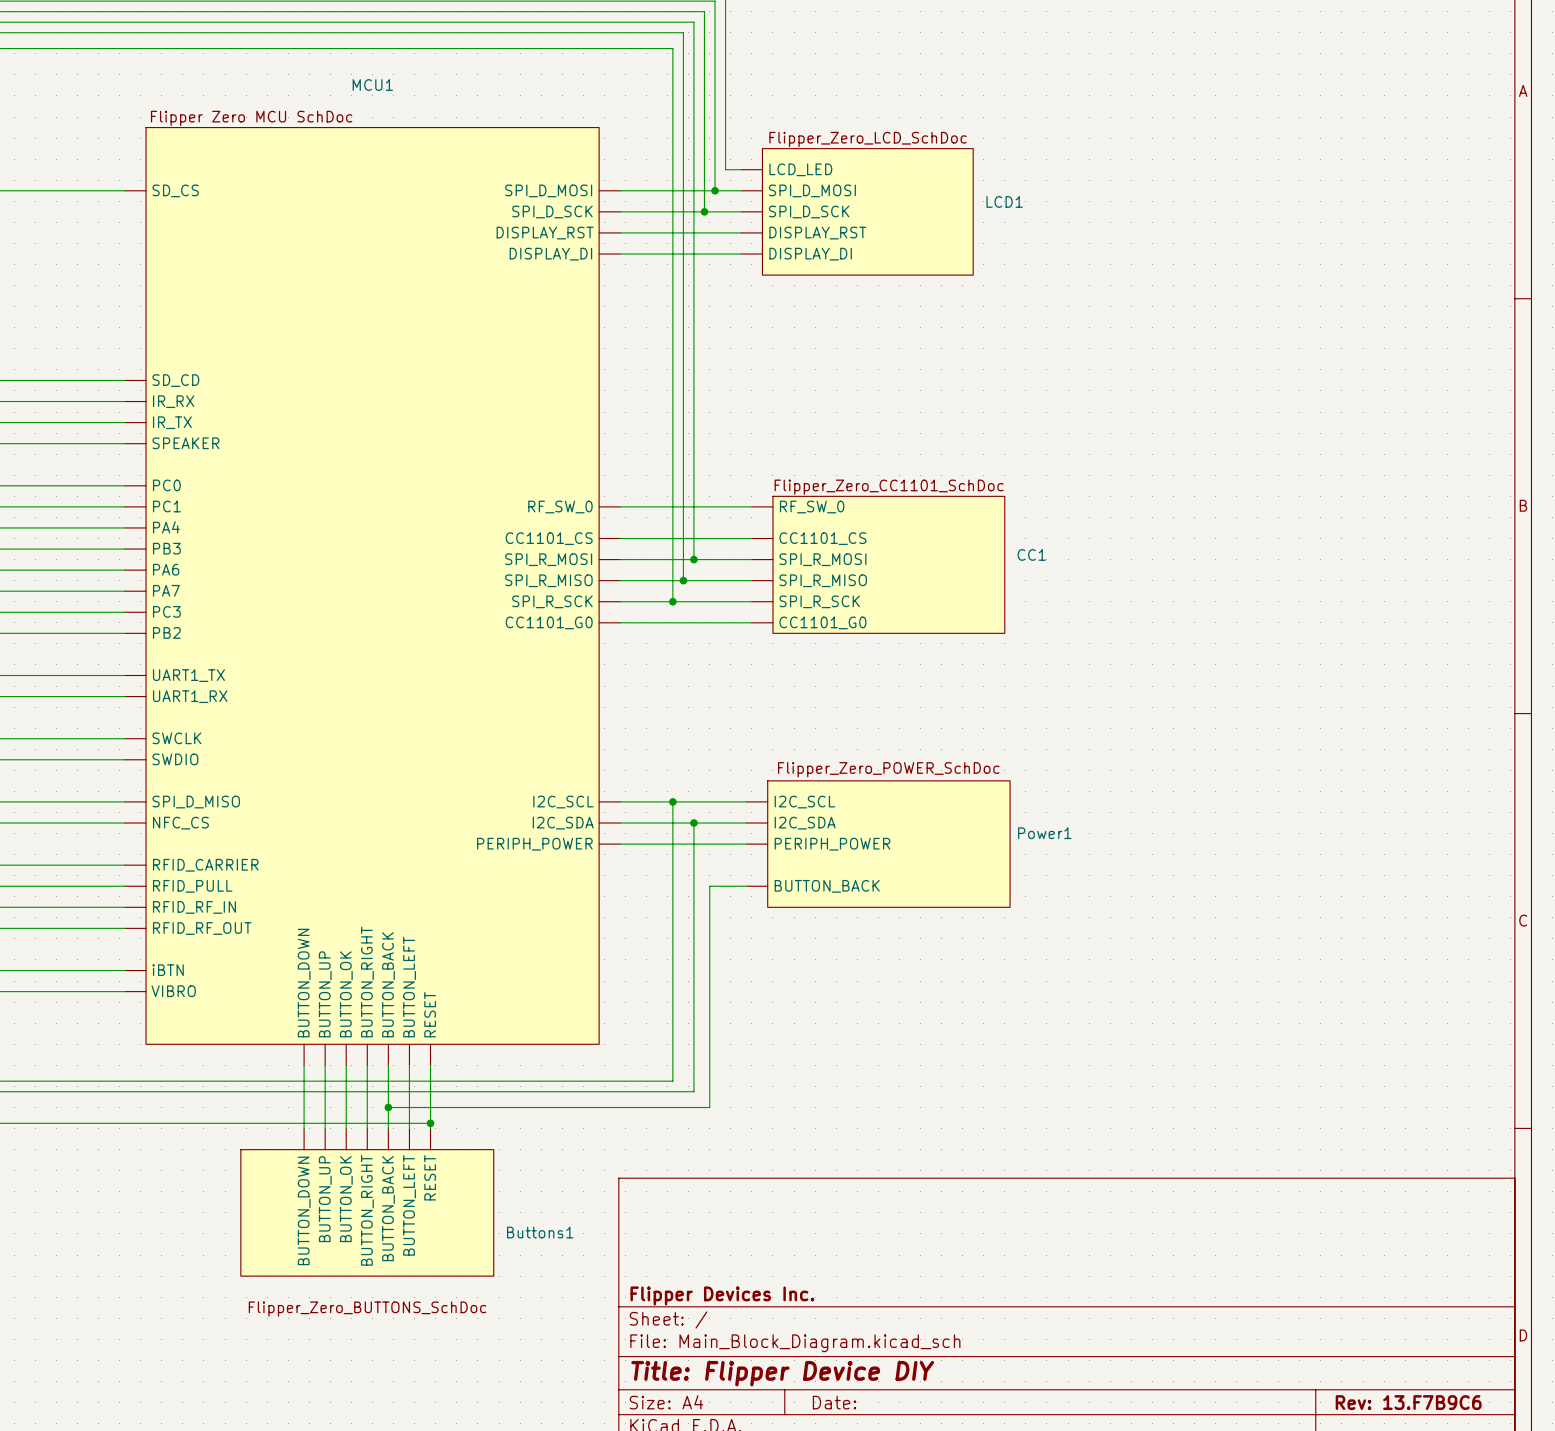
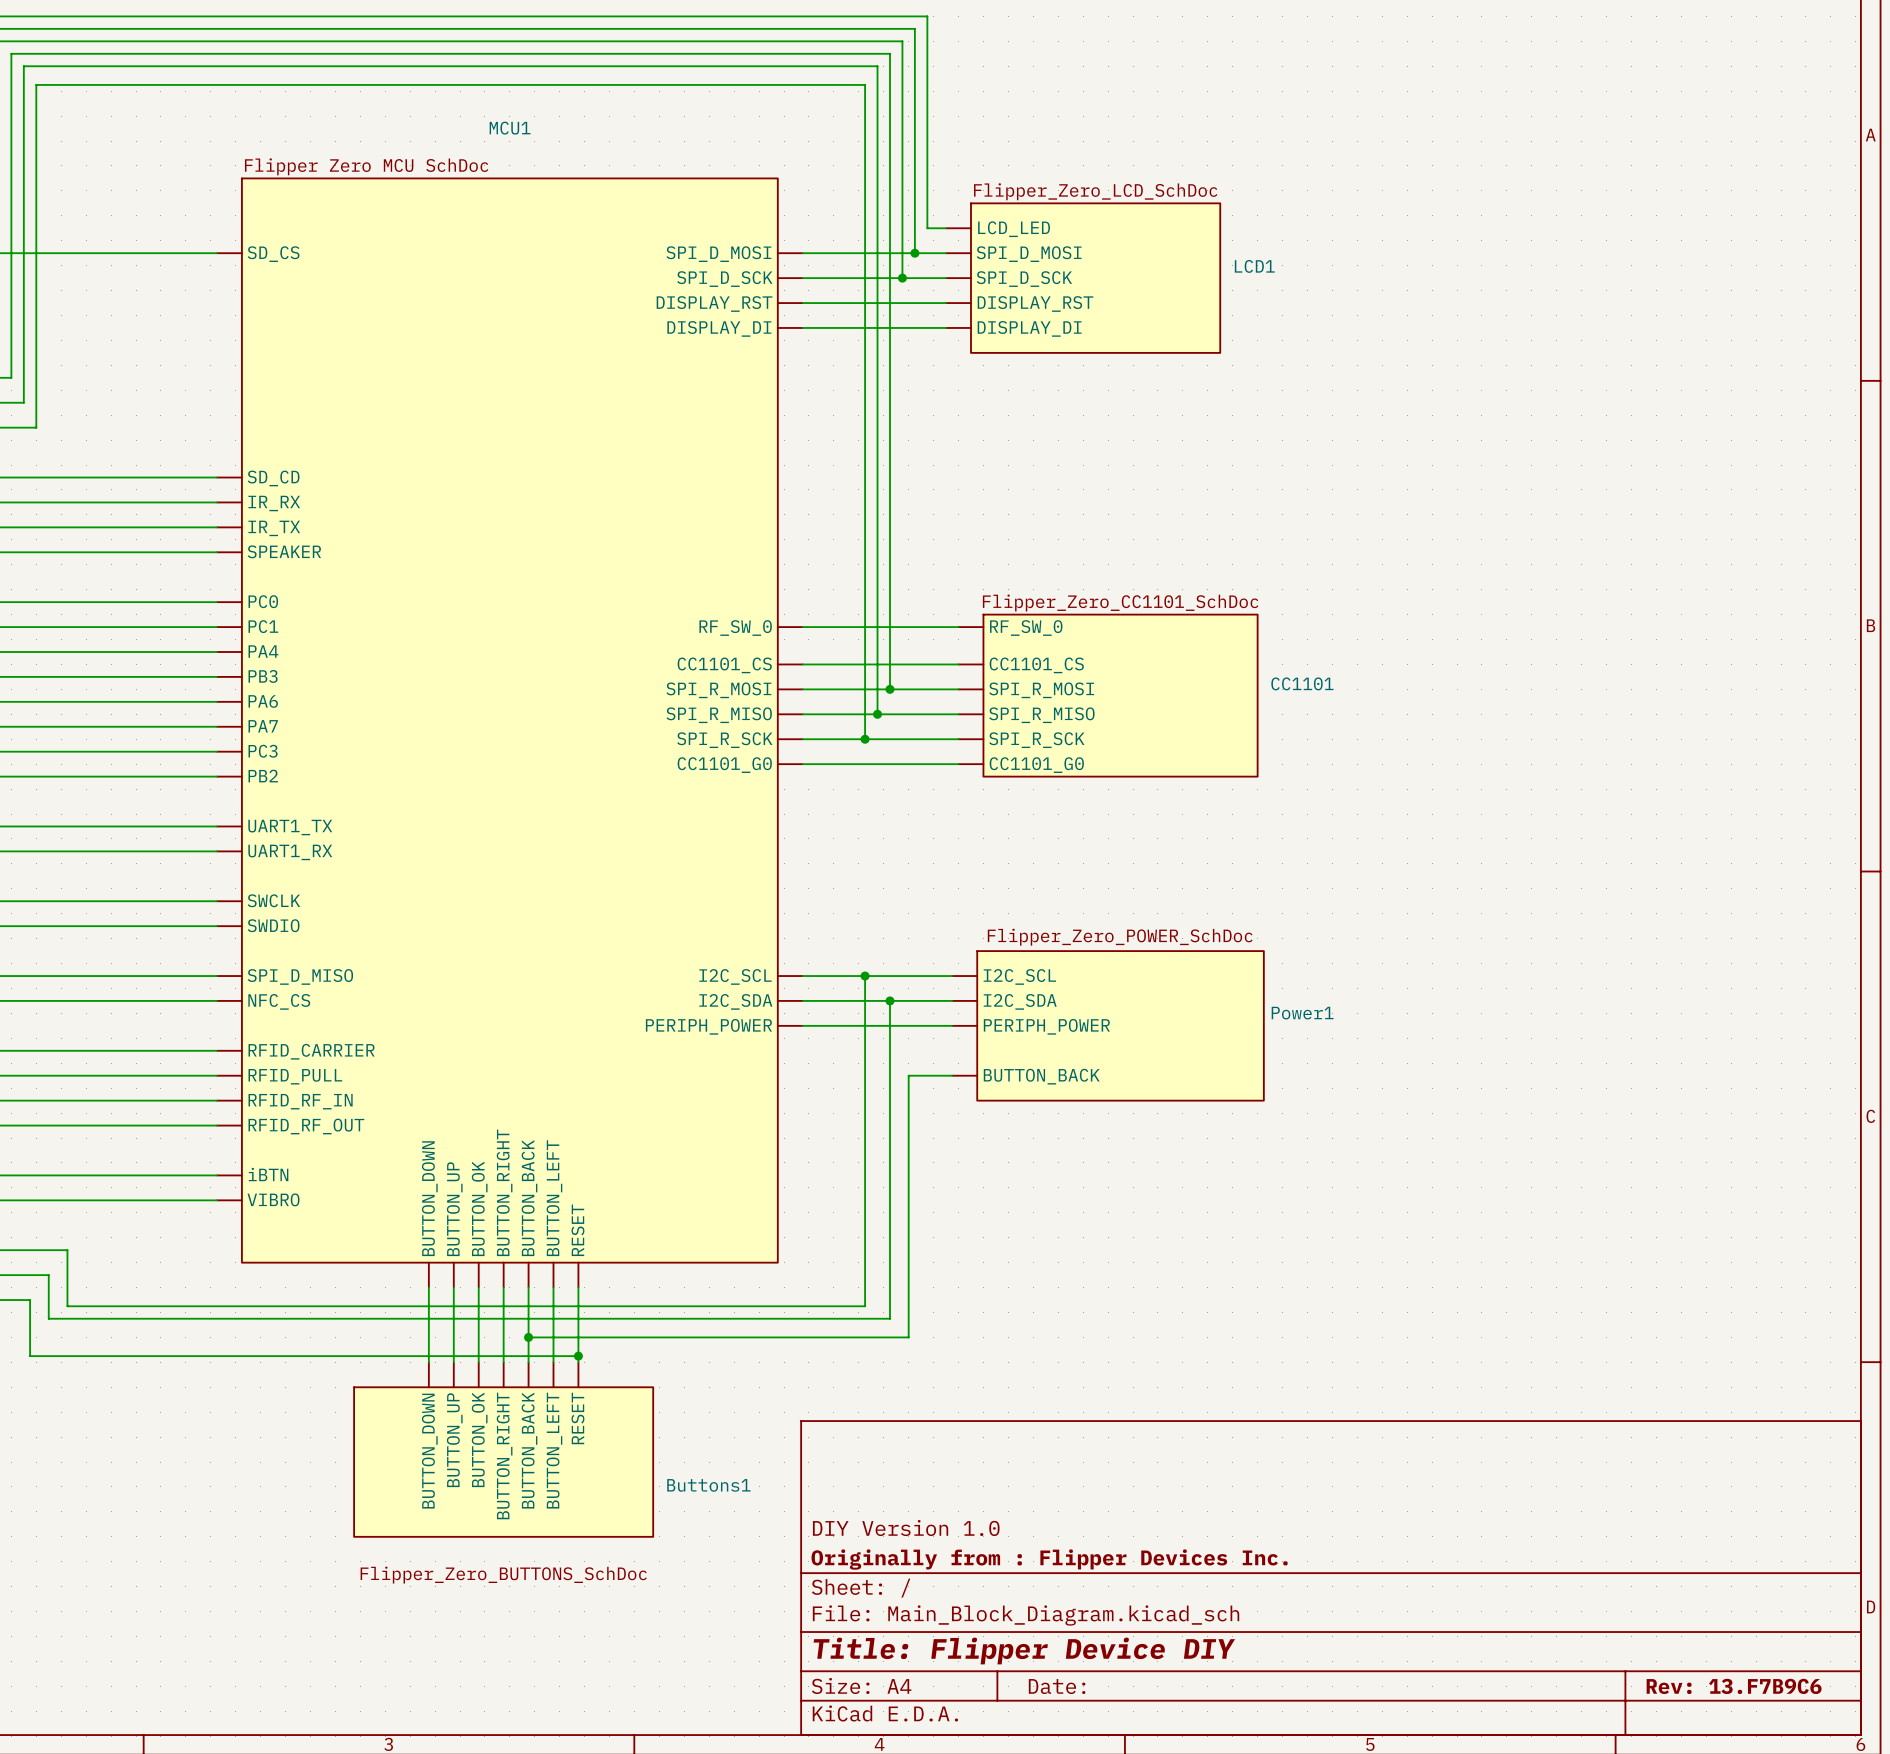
CC1 name: CC1 (1031, 554) -> CC1101 (1302, 683)
title block: none -> DIY Version 1.0 (906, 1528)
title block: Flipper Devices Inc. (722, 1295) -> Originally from : Flipper Devices Inc. (1049, 1559)

